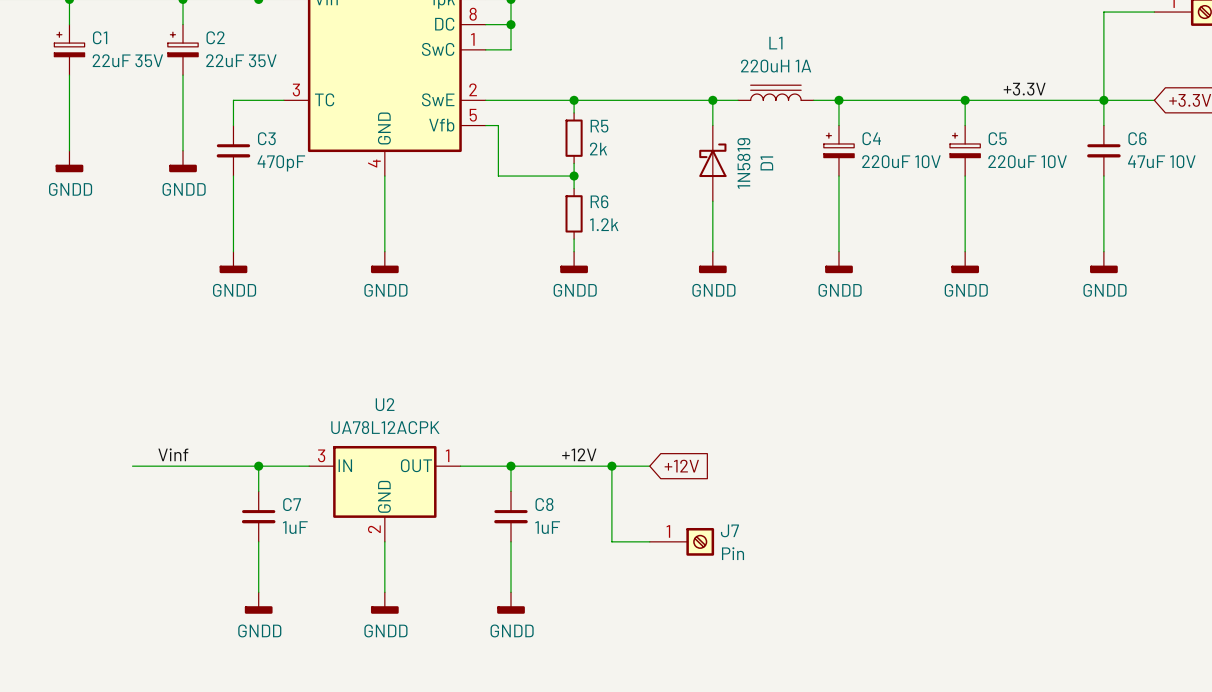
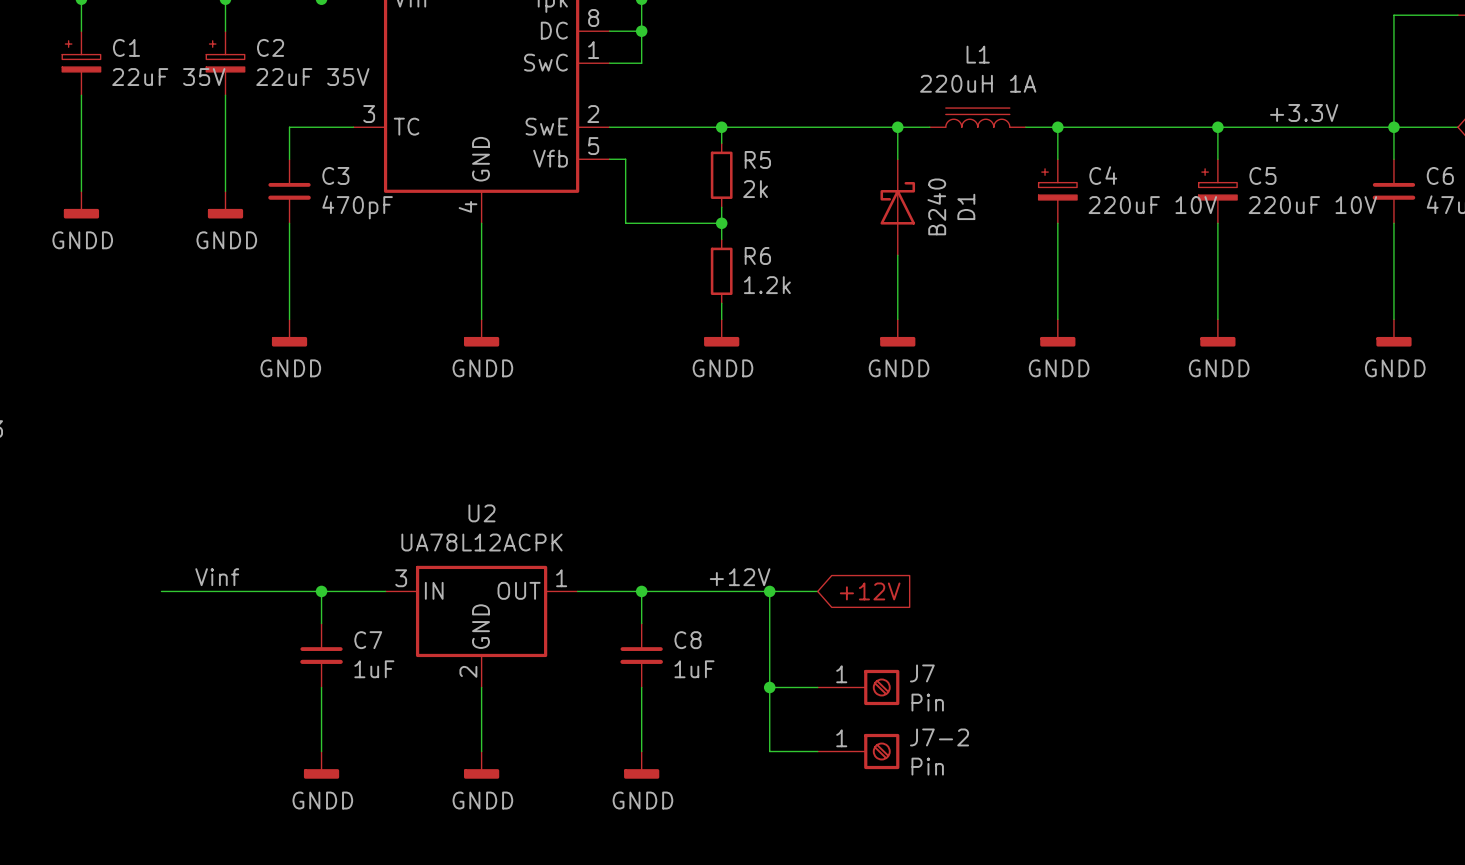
D1 value: 1N5819 (743, 163) -> B240 (936, 206)
wire: none -> (769, 687) (769, 751) (817, 751)
junction: none -> (769, 687)
J7-2: none -> Pin (858, 751)

